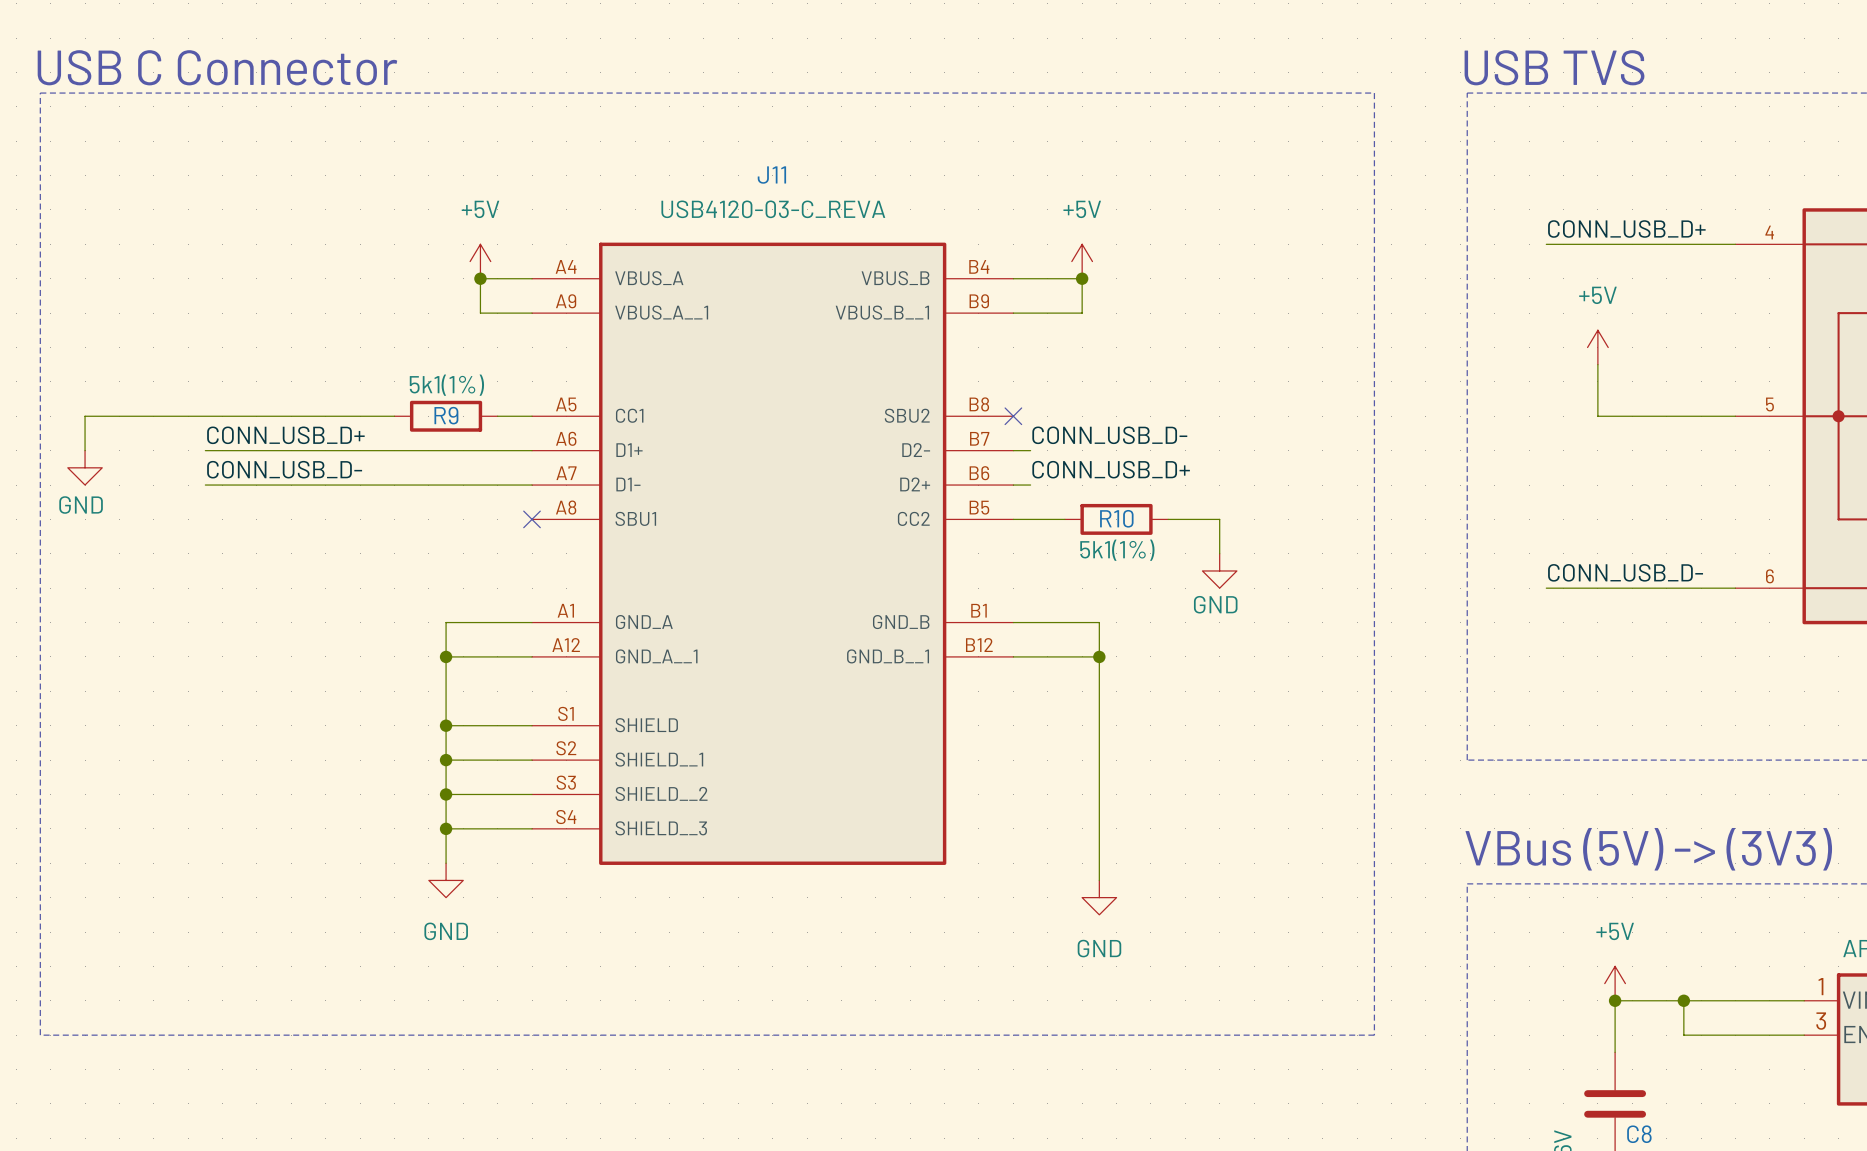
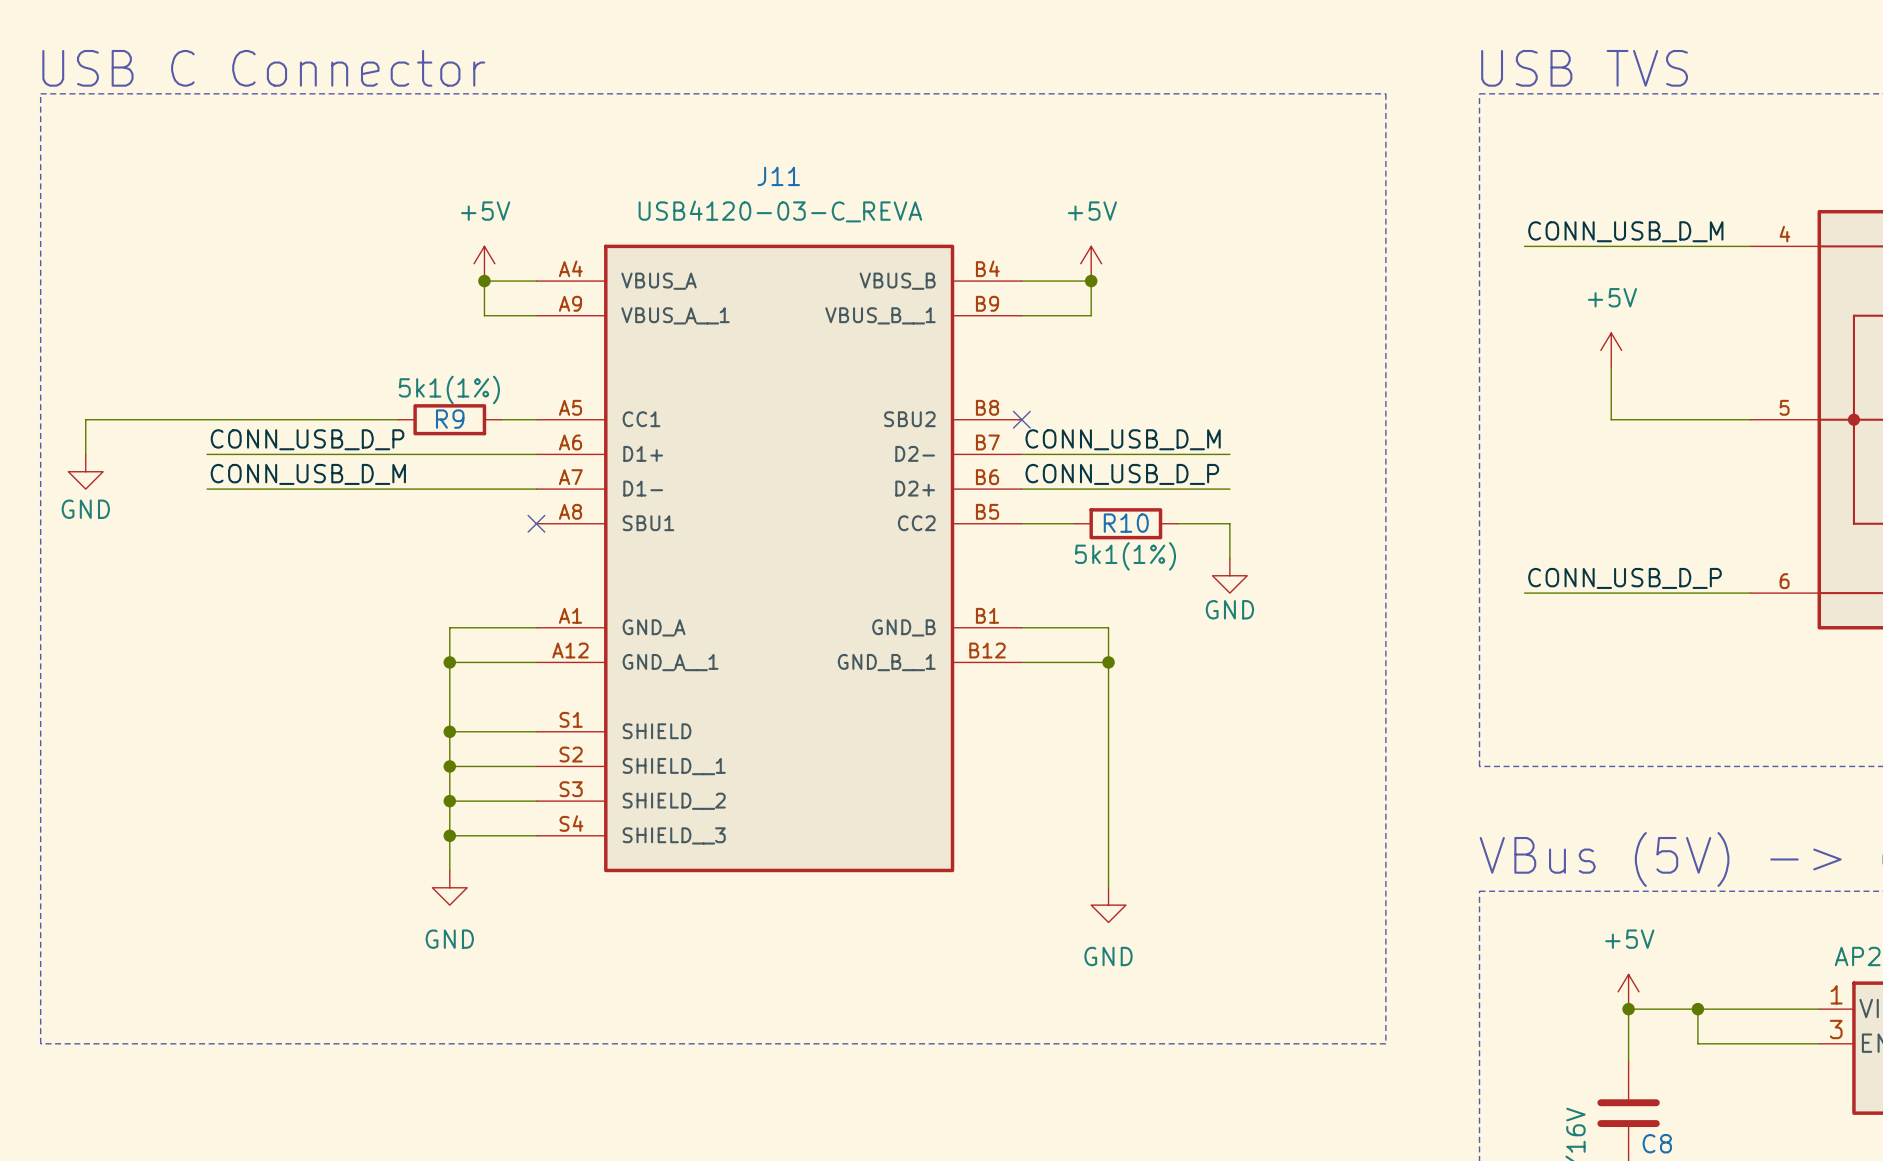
label: CONN_USB_D+ (1626, 229) -> CONN_USB_D_M (1625, 231)
wire: none -> (1524, 246) (1559, 246)
label: CONN_USB_D+ (285, 435) -> CONN_USB_D_P (307, 439)
label: CONN_USB_D- (1109, 435) -> CONN_USB_D_M (1123, 439)
wire: none -> (1039, 454) (1229, 454)
label: CONN_USB_D- (284, 469) -> CONN_USB_D_M (308, 474)
label: CONN_USB_D+ (1111, 469) -> CONN_USB_D_P (1122, 474)
wire: none -> (1039, 489) (1229, 489)
label: CONN_USB_D- (1625, 572) -> CONN_USB_D_P (1625, 578)
wire: none -> (1524, 593) (1559, 593)

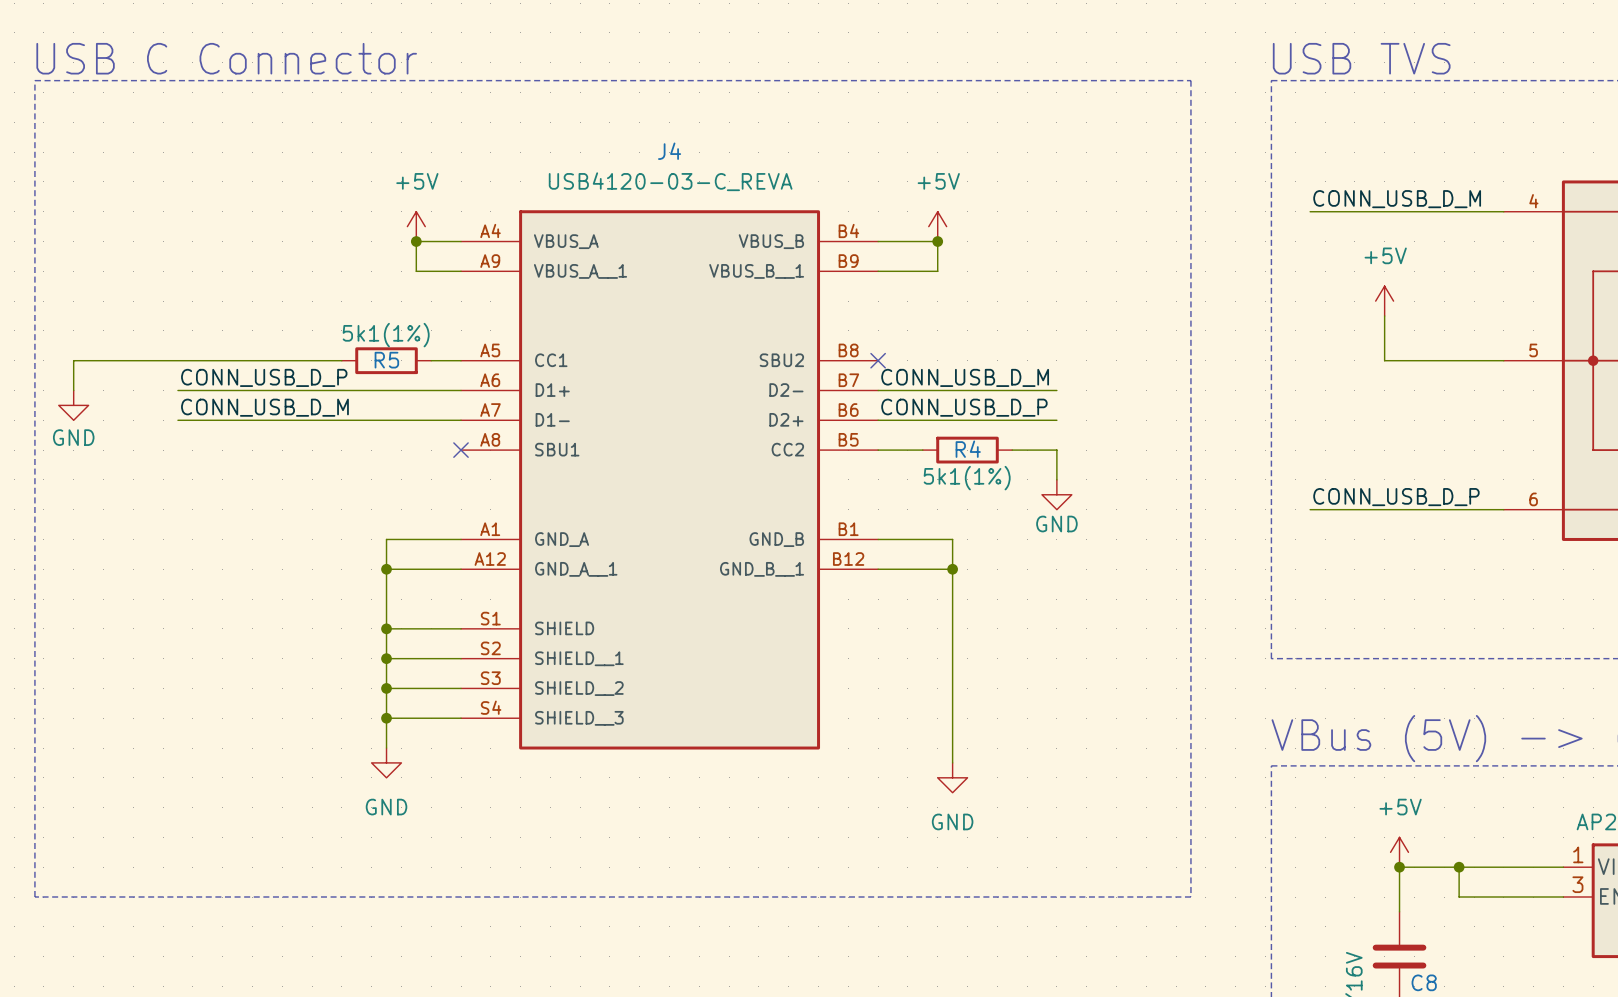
J11 name: J11 (778, 176) -> J4 (669, 151)
R9 name: R9 (450, 419) -> R5 (386, 360)
R10 name: R10 (1126, 523) -> R4 (968, 449)

